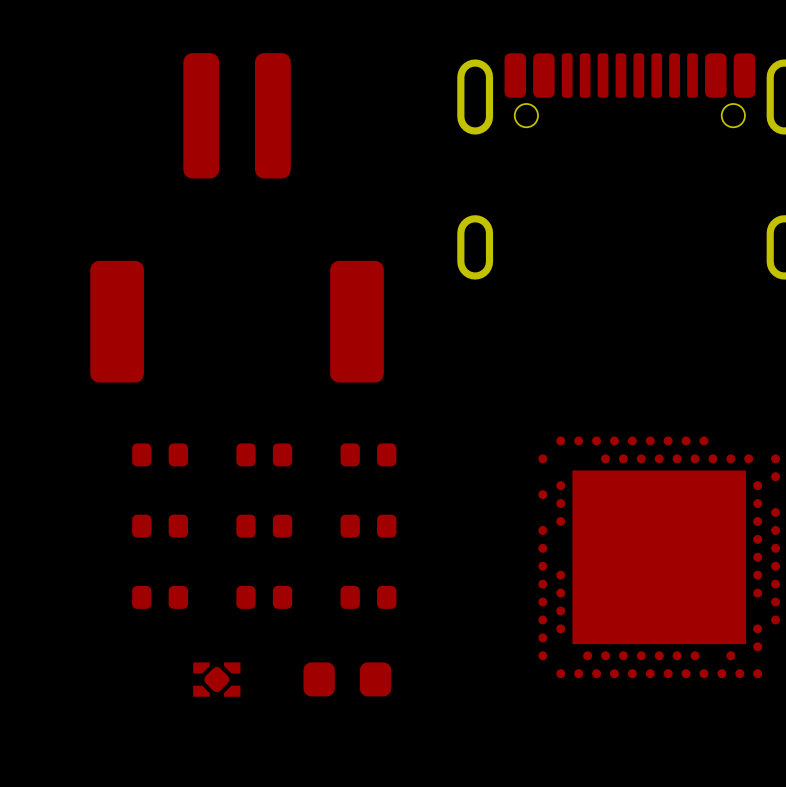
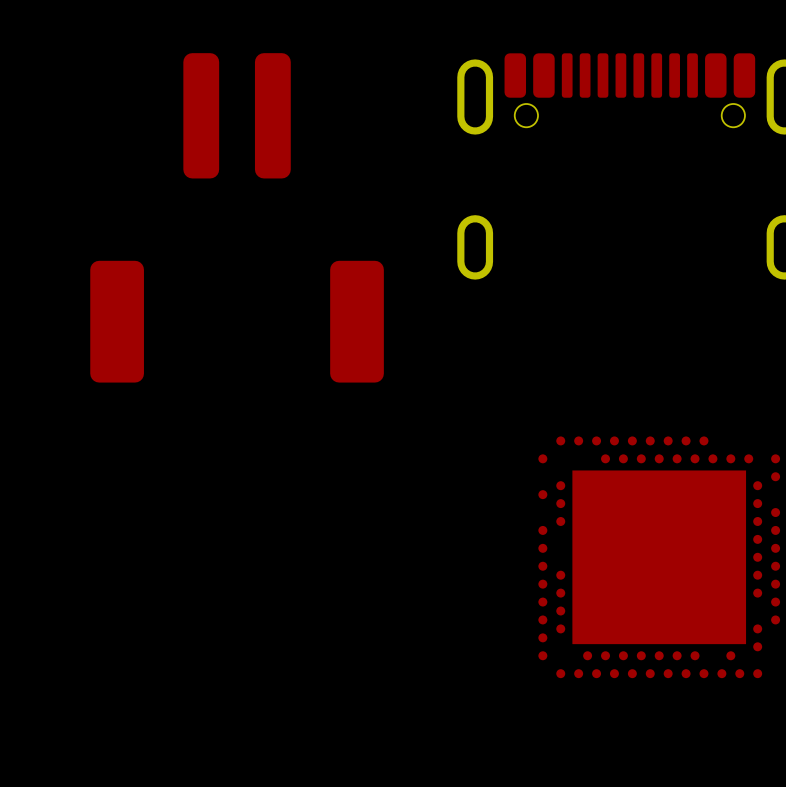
part: (160, 454) -> none
part: (264, 454) -> none
part: (368, 454) -> none
part: (160, 526) -> none
part: (264, 526) -> none
part: (368, 526) -> none
part: (160, 597) -> none
part: (264, 597) -> none
part: (368, 597) -> none
part: (216, 679) -> none
part: (347, 679) -> none

